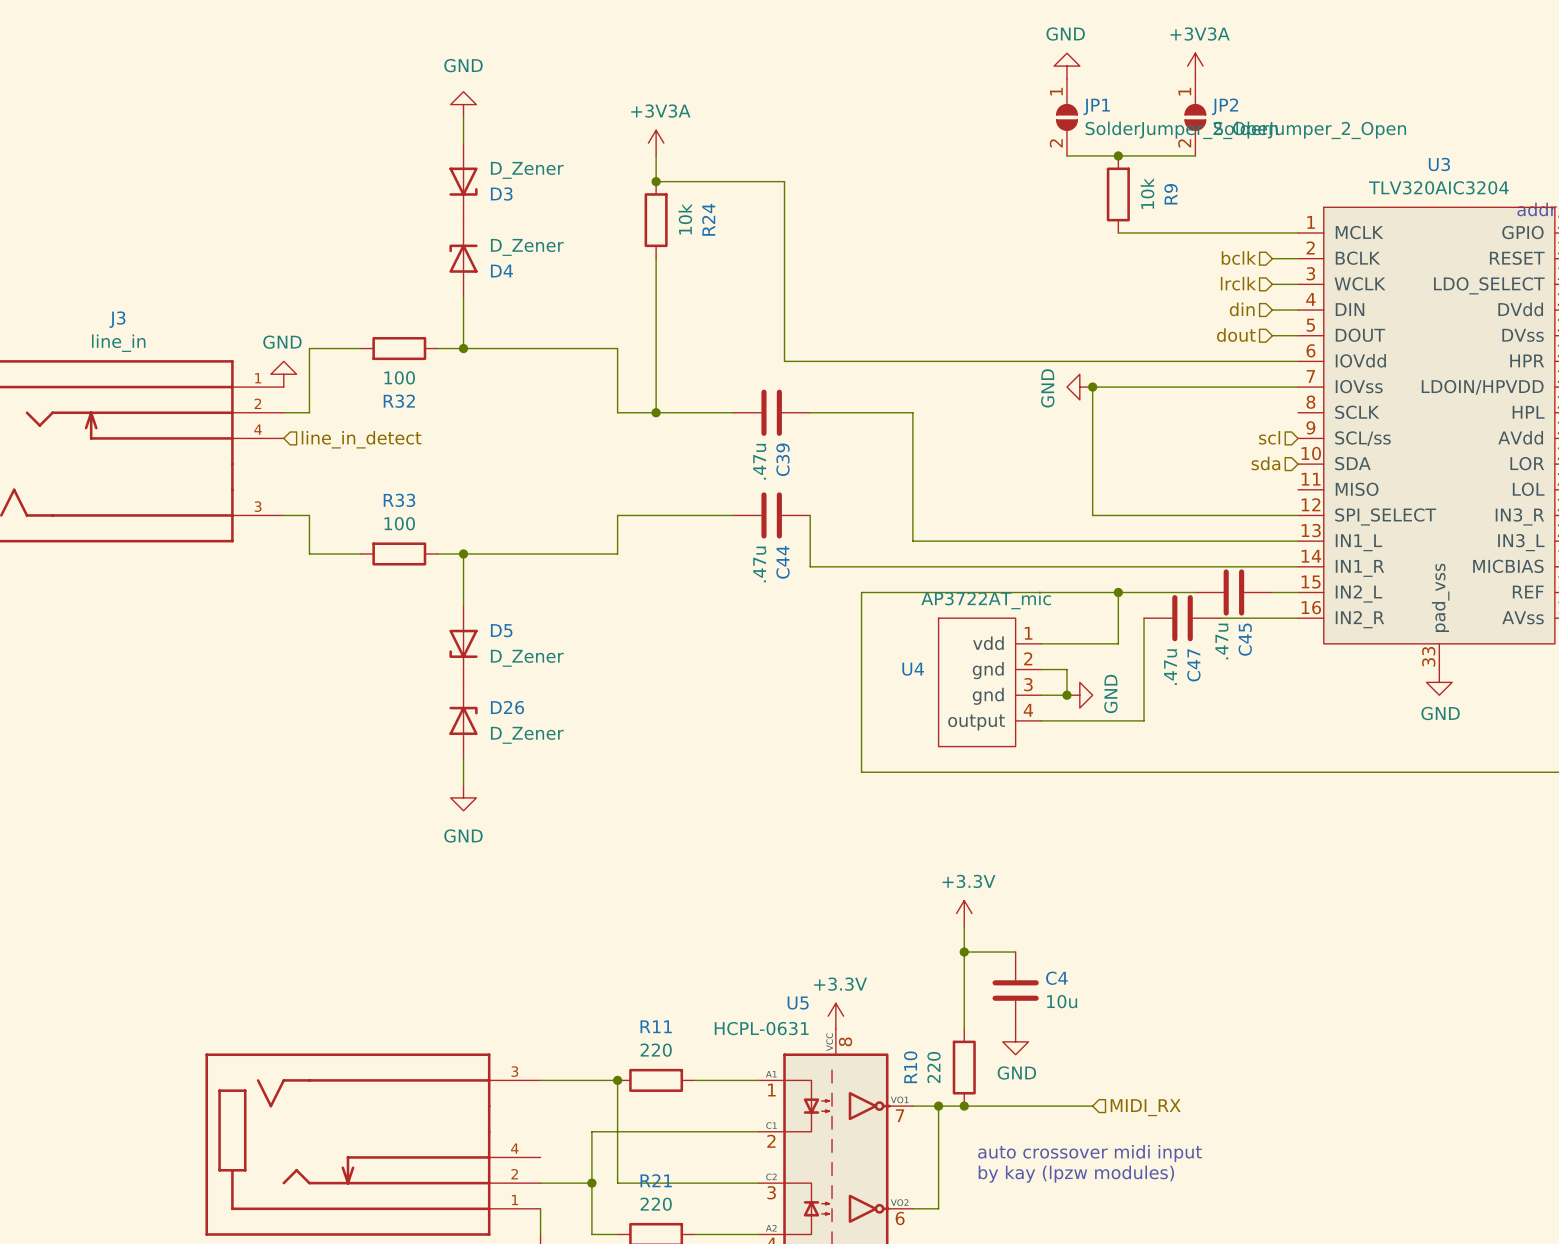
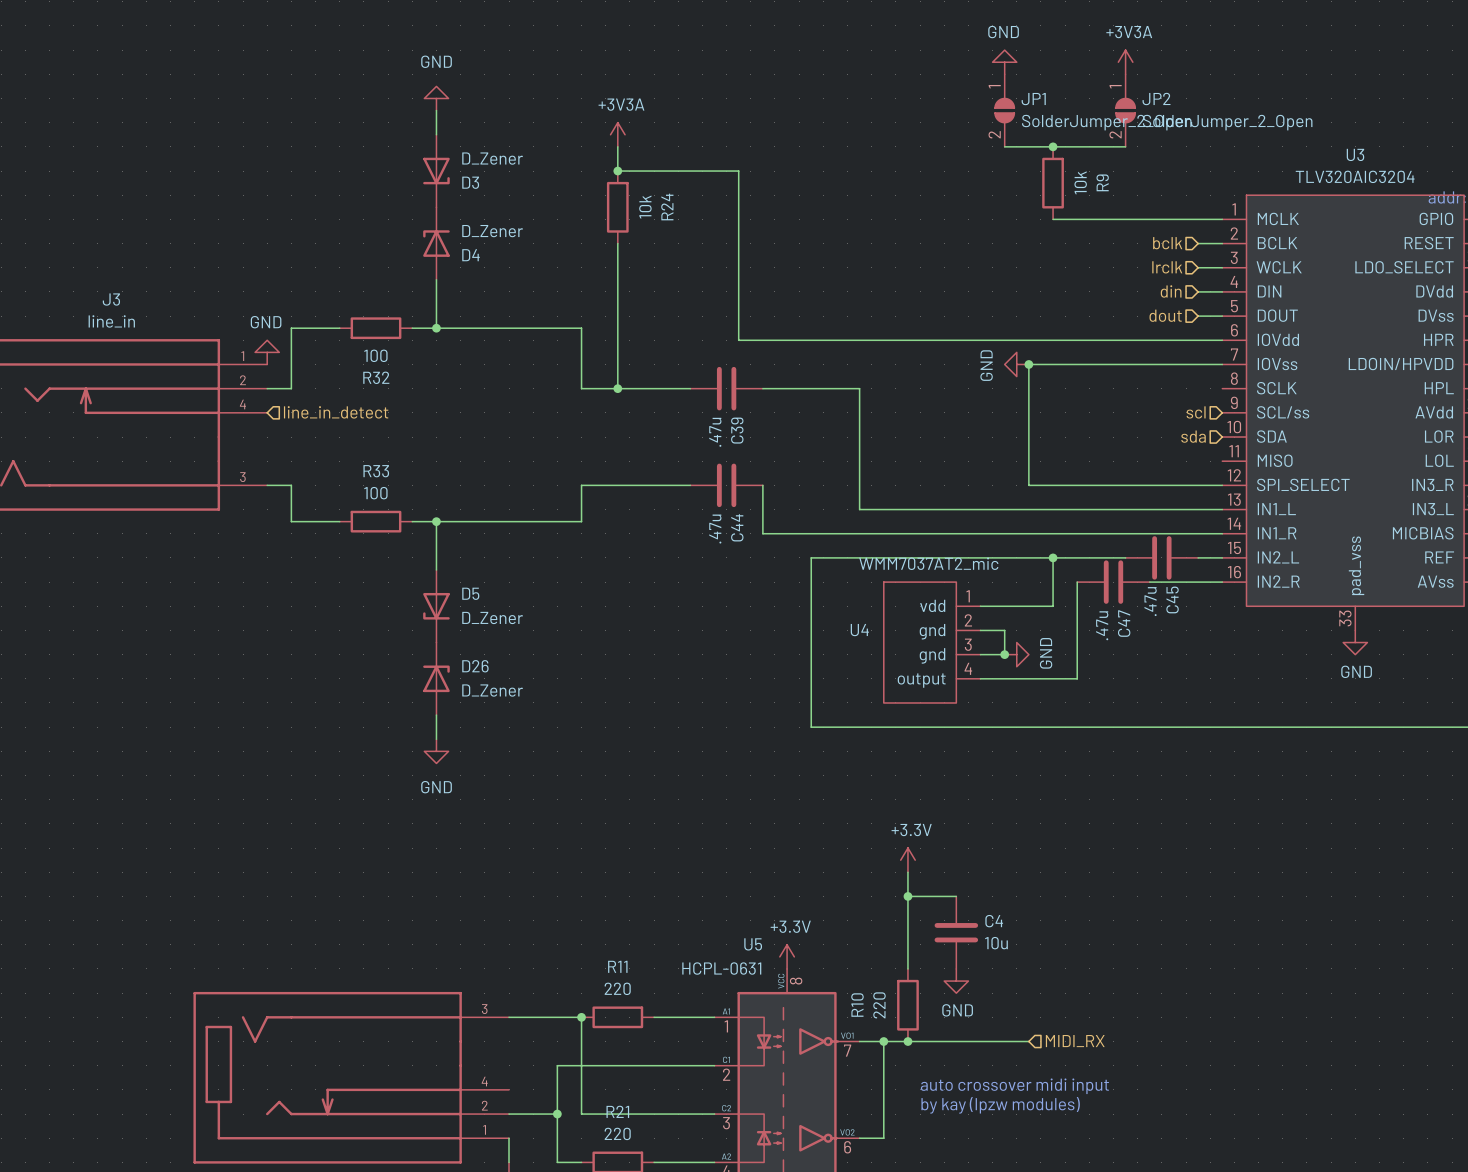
U4 value: AP3722AT_mic (986, 600) -> WMM7037AT2_mic (928, 563)

